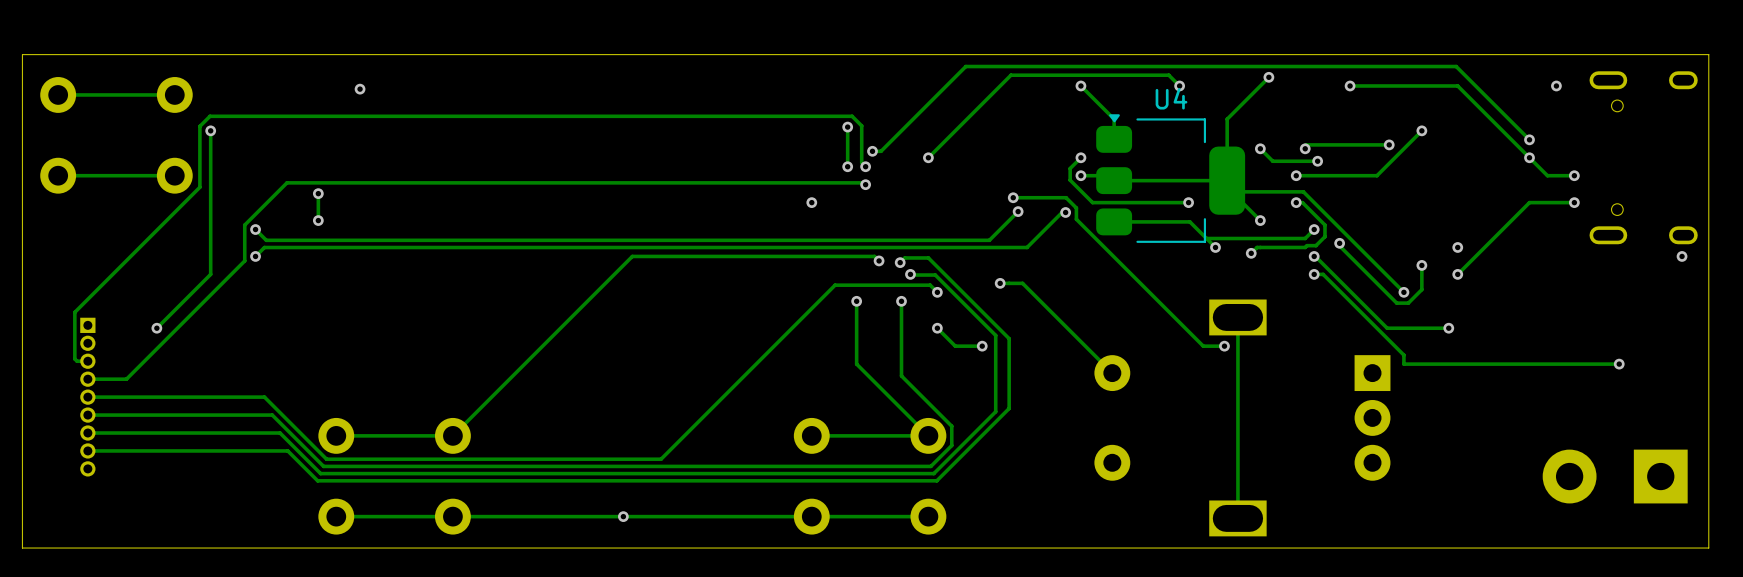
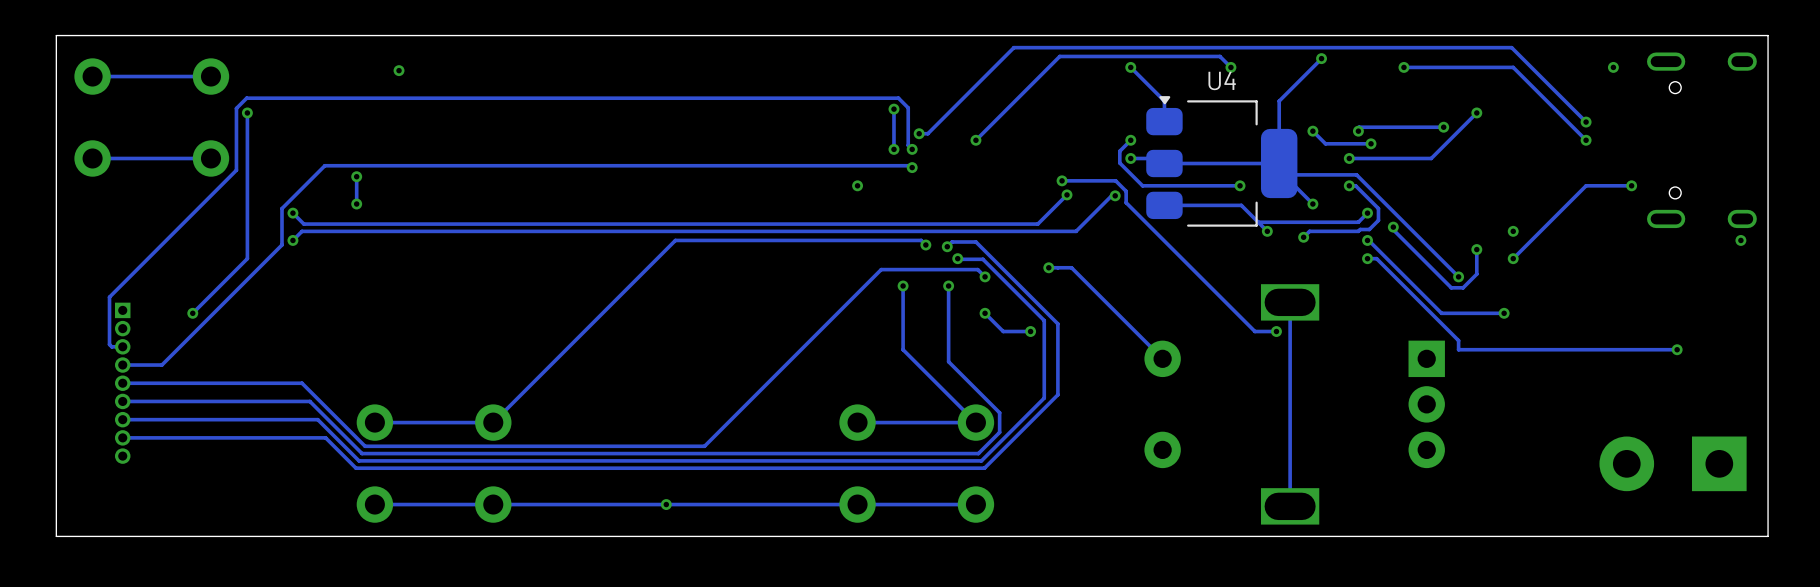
track: (1529, 157) (1547, 175) (1574, 175) -> none
via: (1574, 175) -> none

